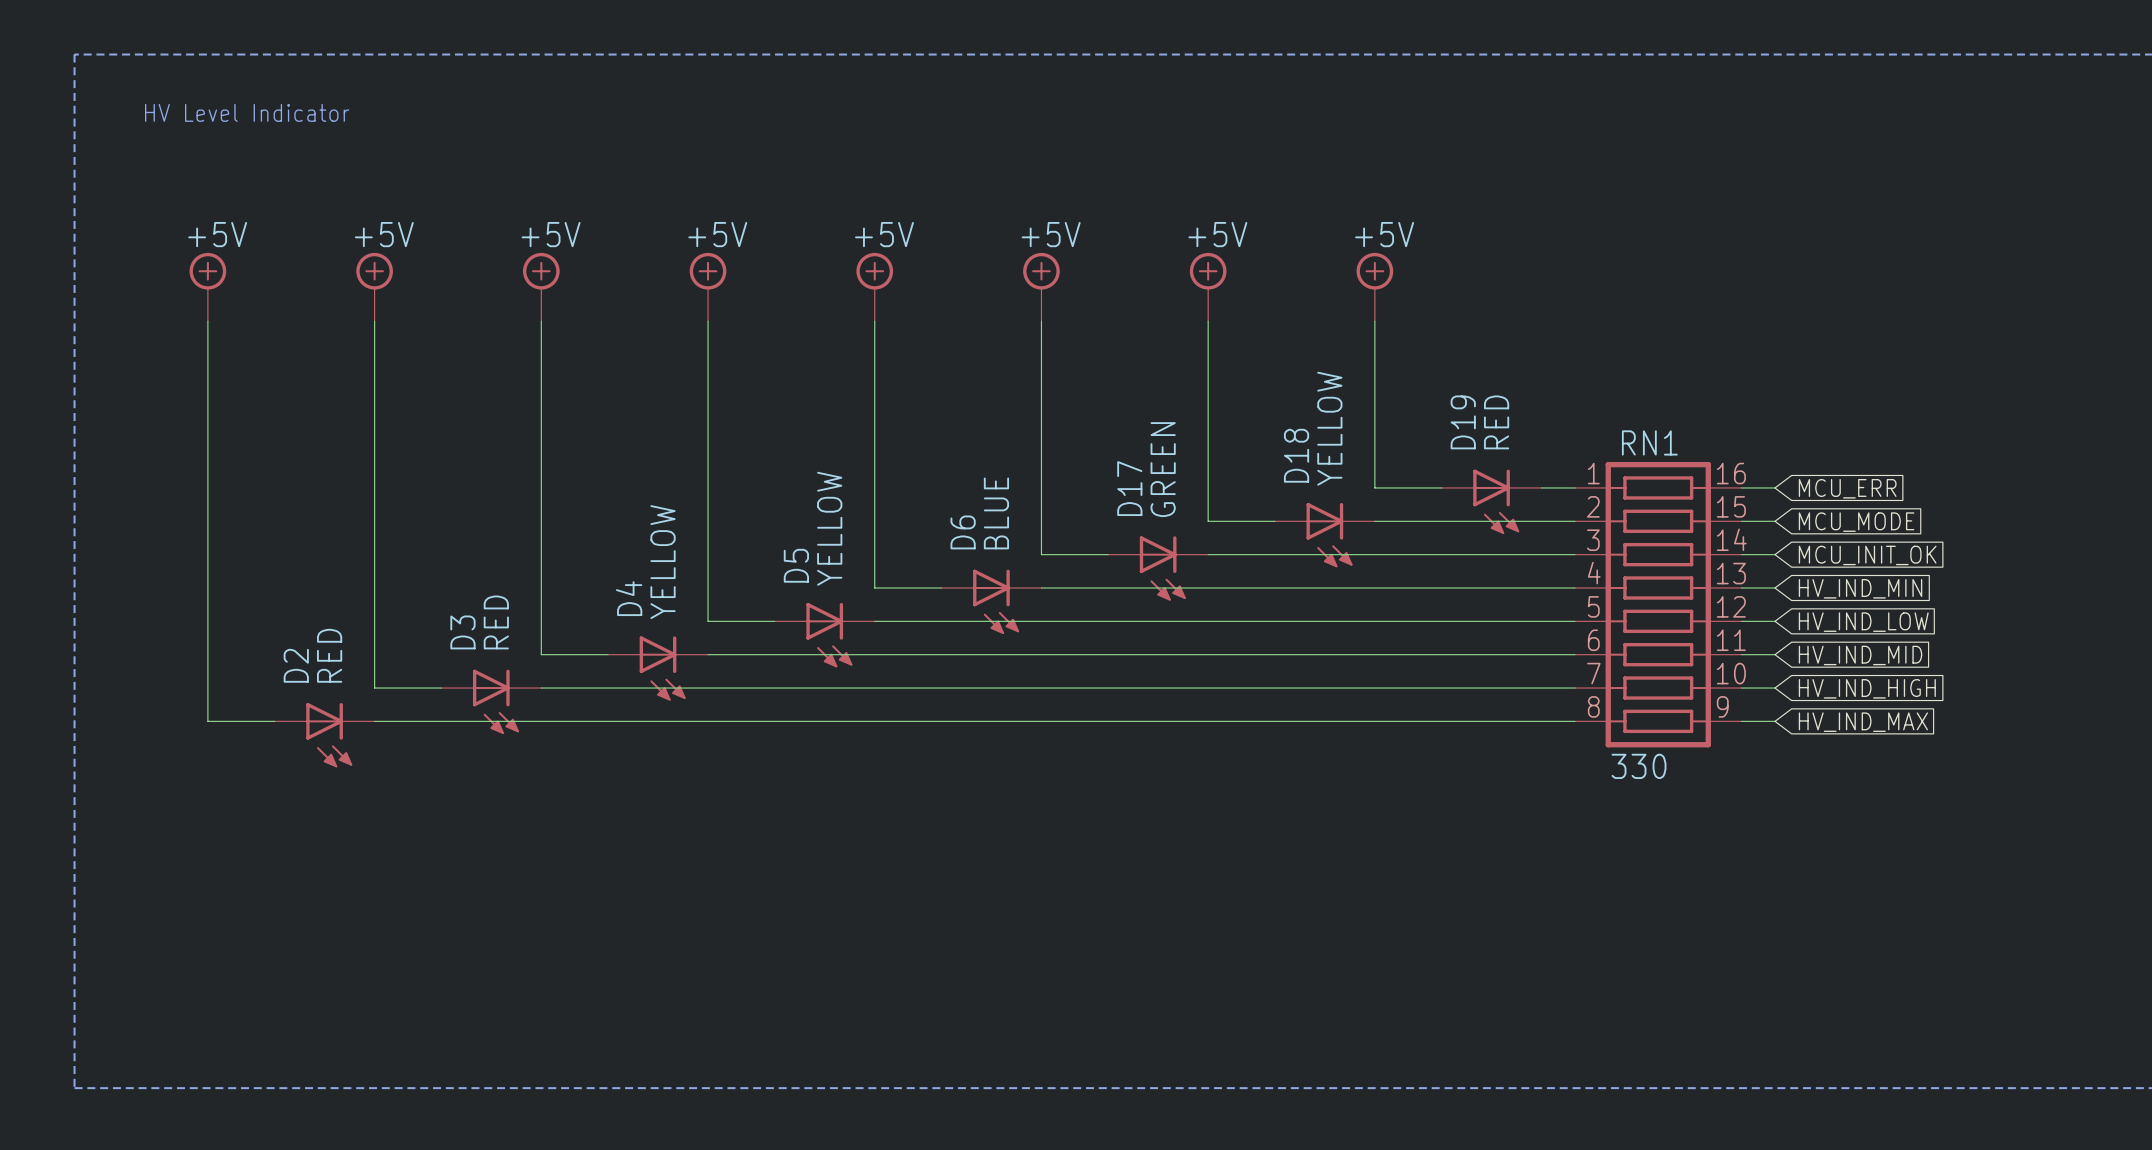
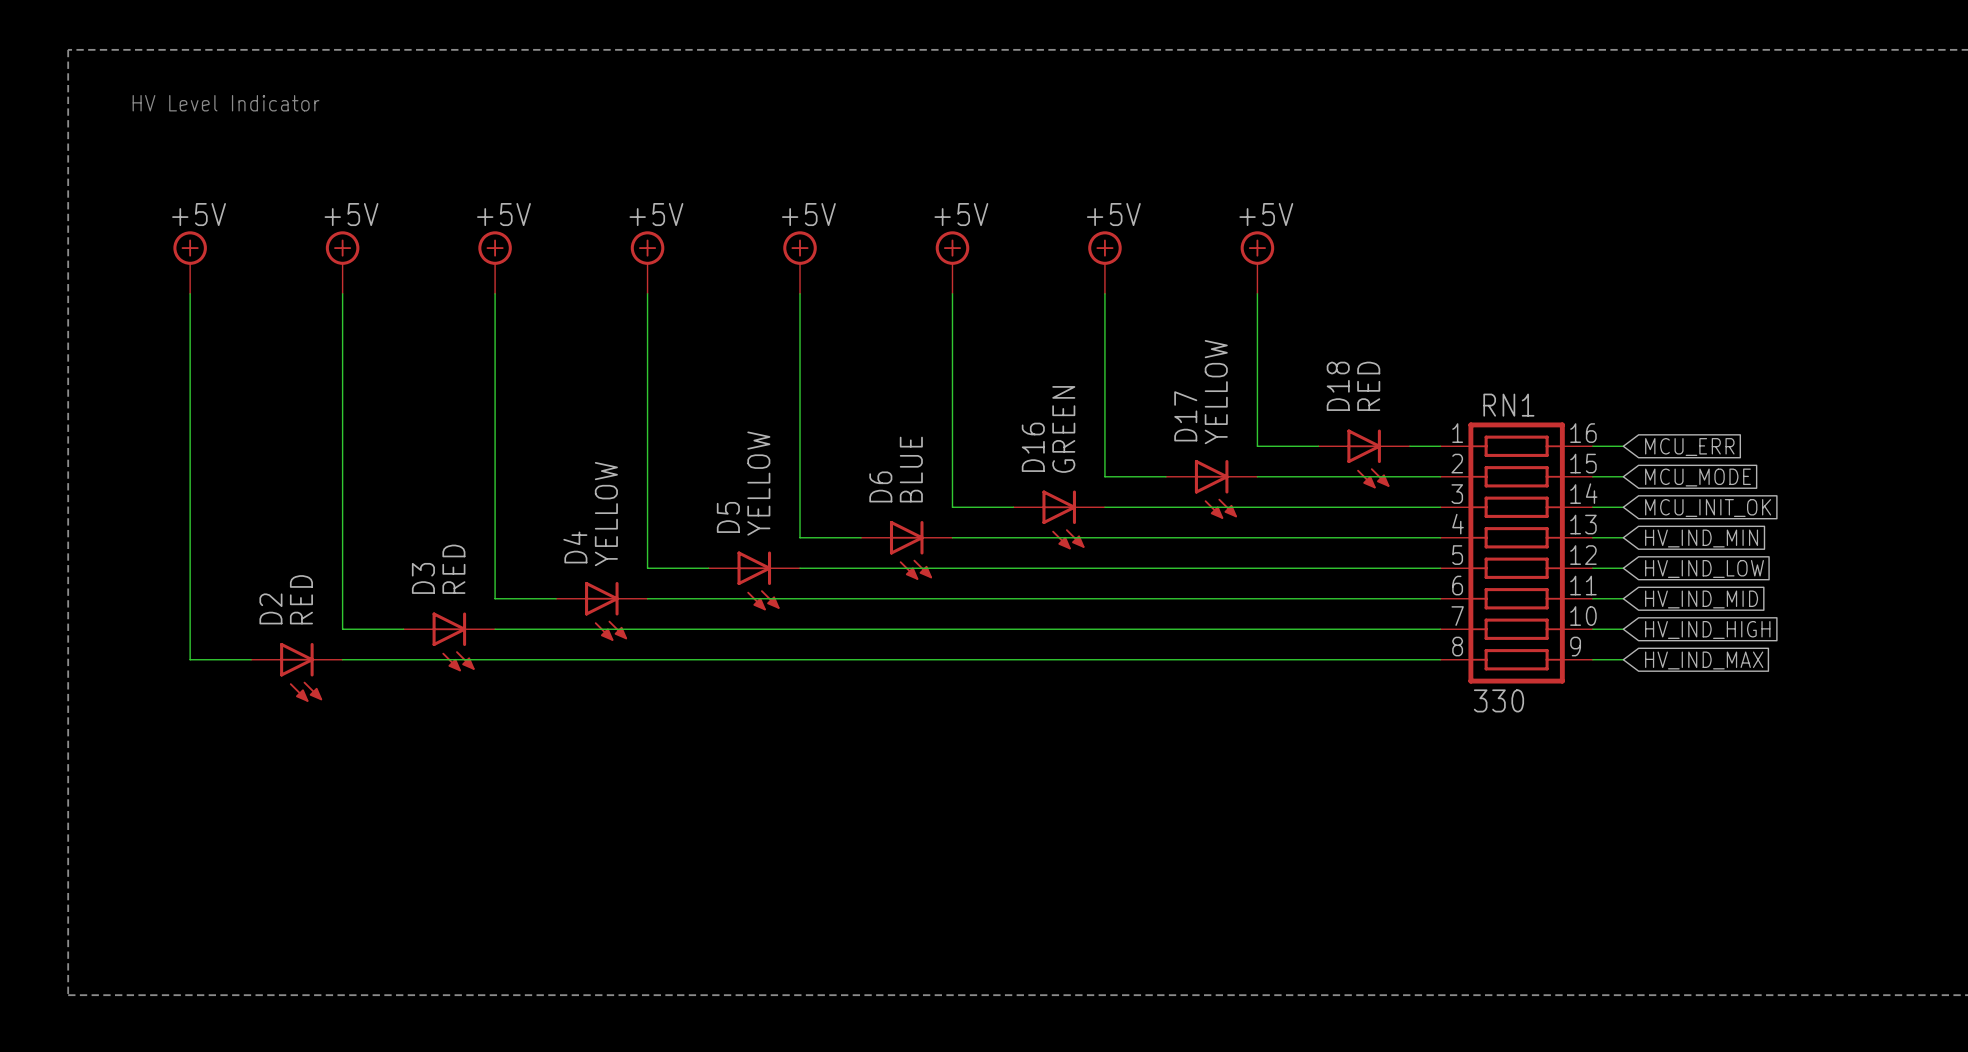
D19 name: D19 (1463, 422) -> D18 (1338, 386)
D18 name: D18 (1296, 455) -> D17 (1185, 416)
D17 name: D17 (1129, 488) -> D16 (1033, 447)

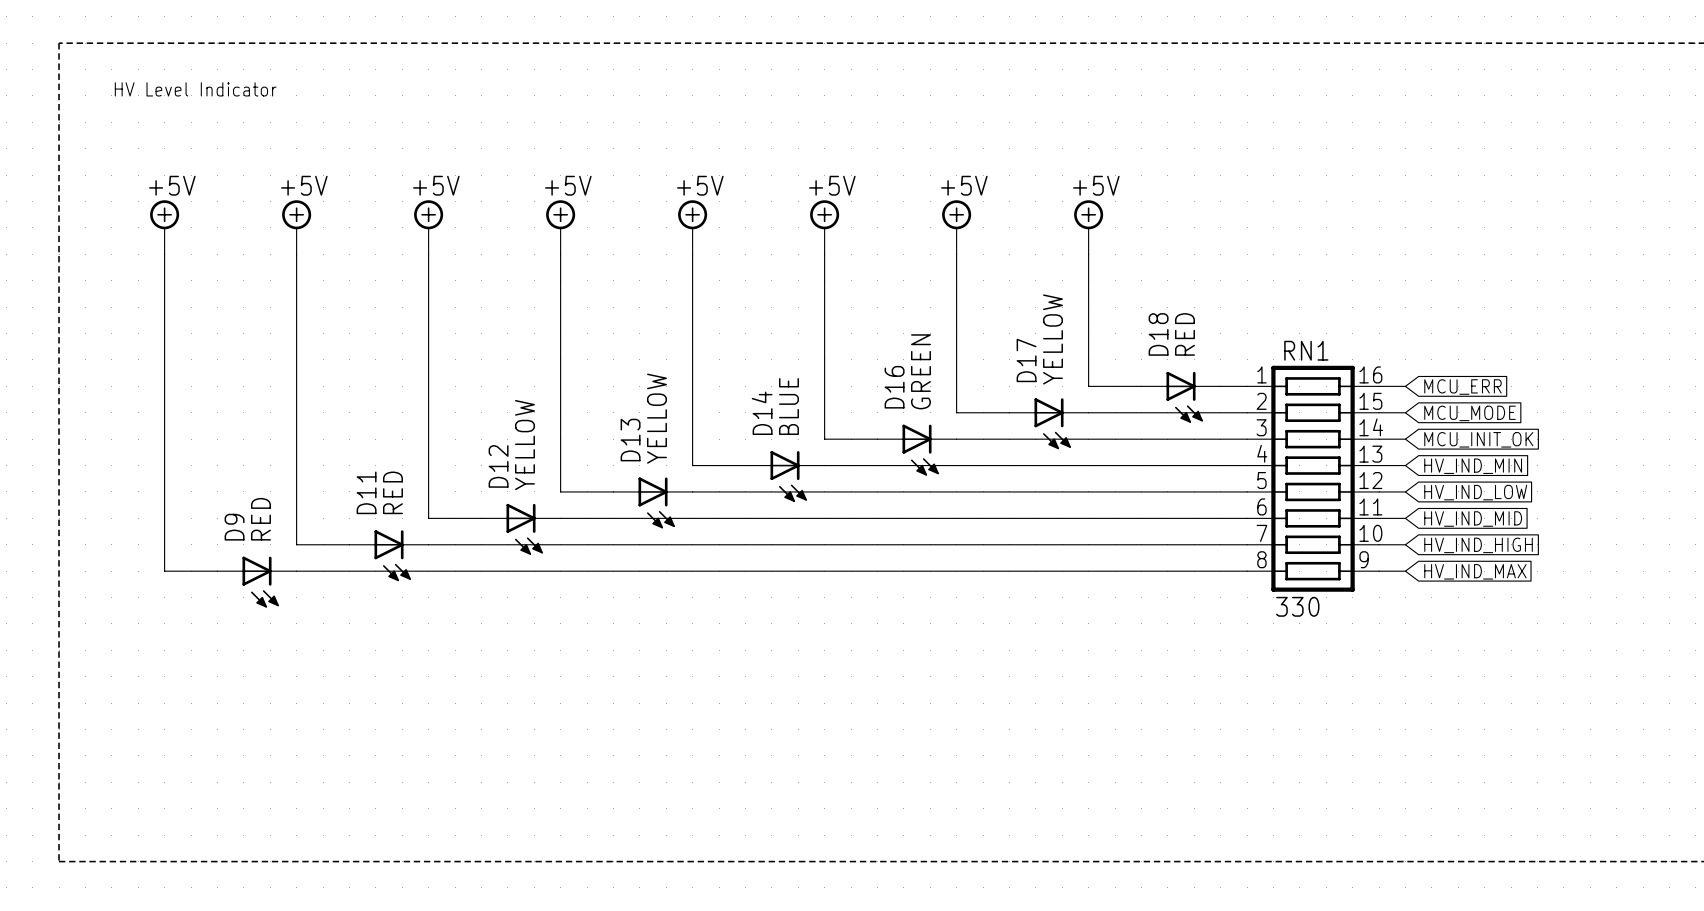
D6 name: D6 (880, 486) -> D14 (762, 413)
D5 name: D5 (728, 517) -> D13 (630, 440)
D4 name: D4 (575, 547) -> D12 (498, 466)
D3 name: D3 (423, 578) -> D11 (366, 492)
D2 name: D2 (270, 608) -> D9 (234, 527)

